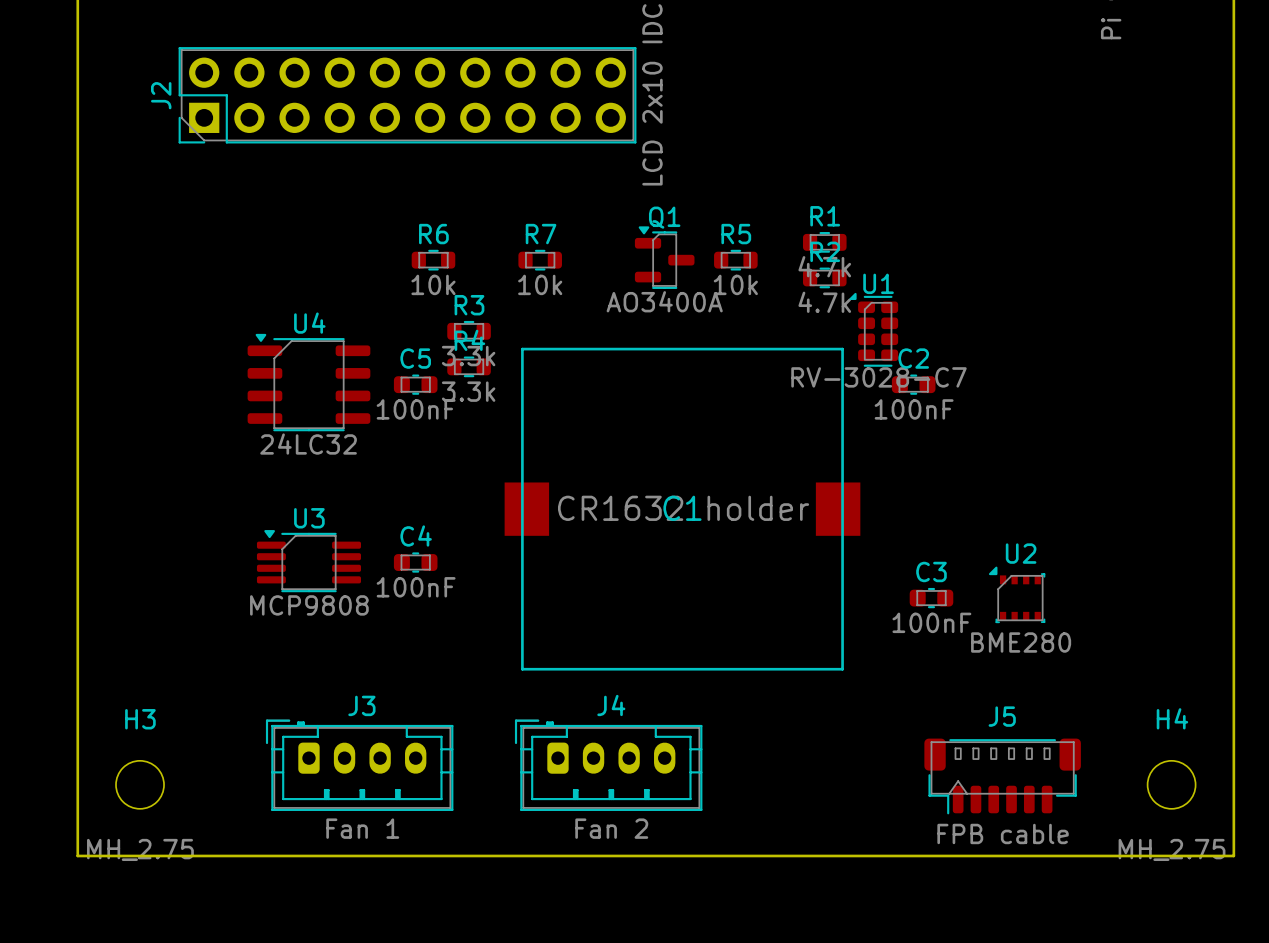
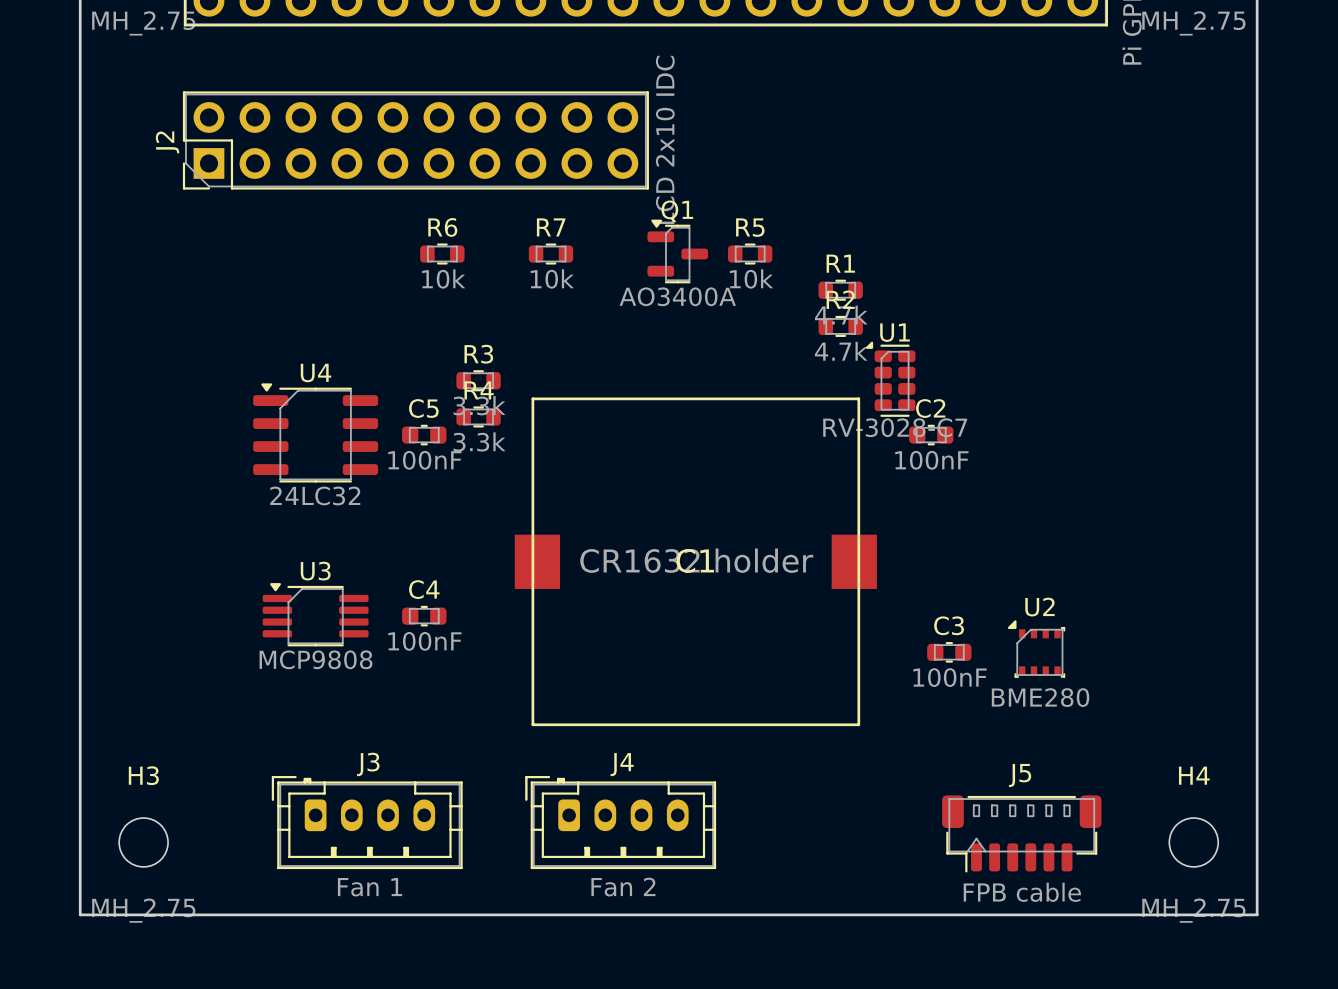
Q1 position: (664, 257) -> (677, 251)
R6 position: (433, 260) -> (442, 254)
R7 position: (540, 260) -> (551, 254)
R5 position: (735, 260) -> (750, 254)

